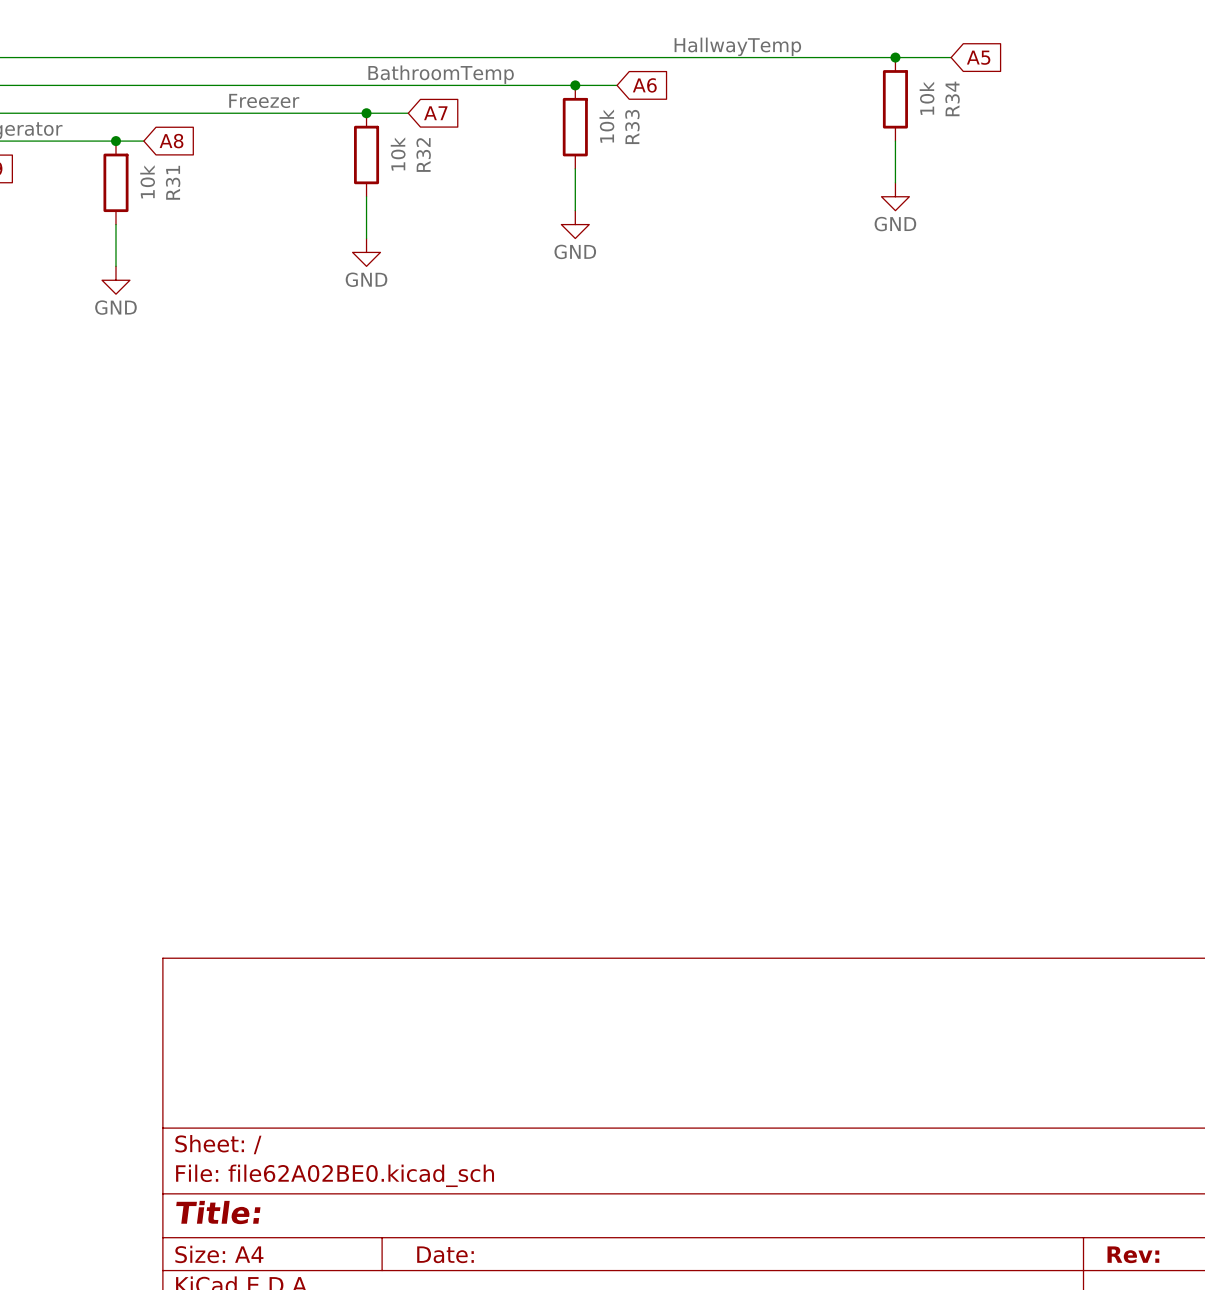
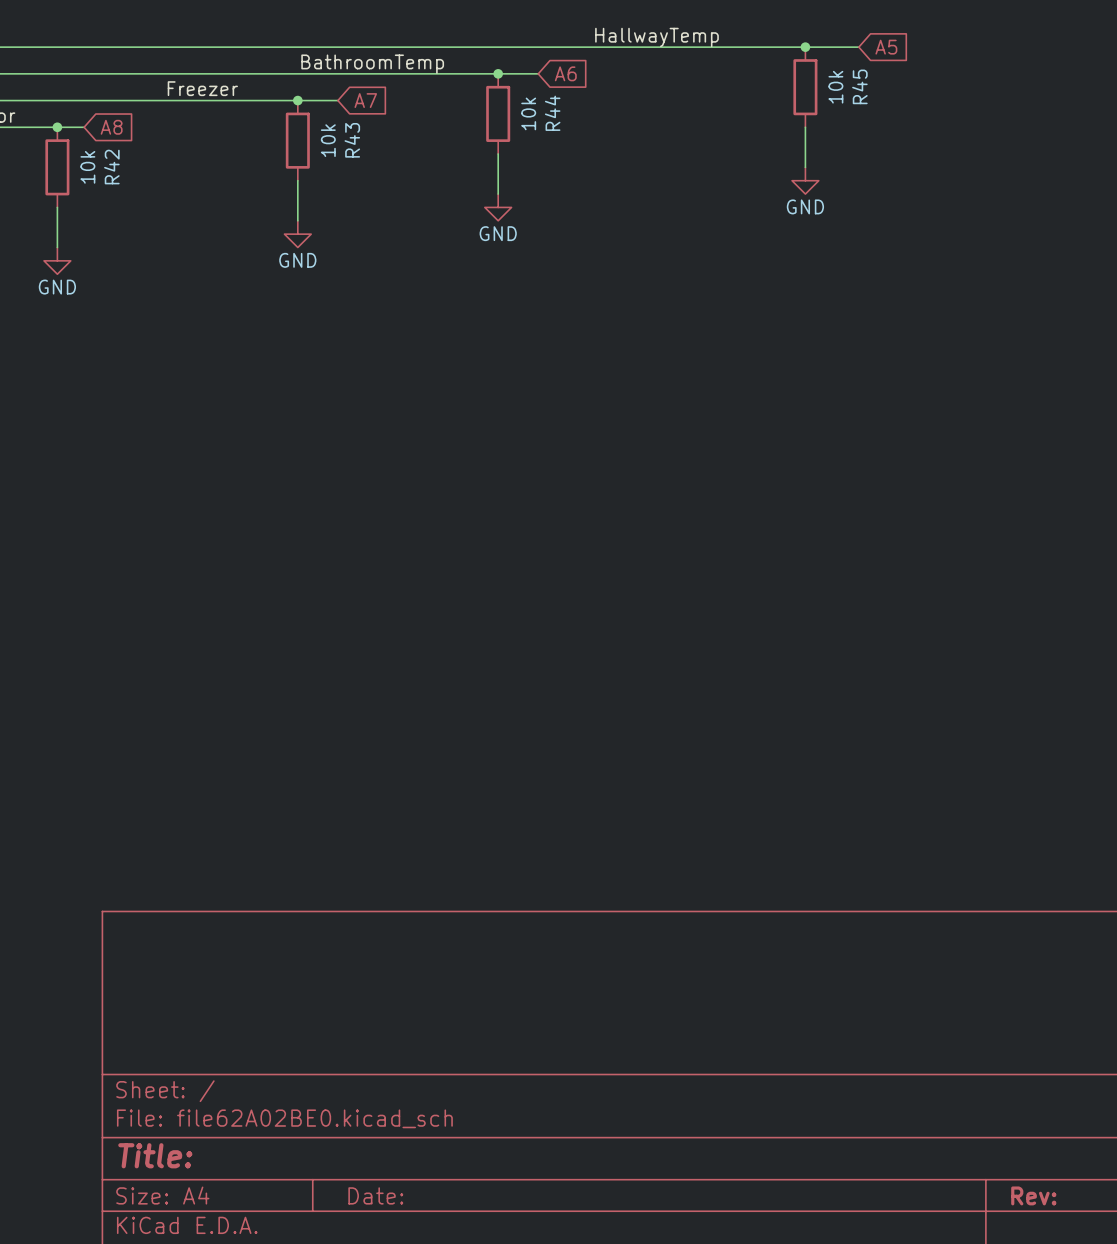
R34 name: R34 (952, 98) -> R45 (859, 86)
R33 name: R33 (632, 126) -> R44 (552, 113)
R32 name: R32 (423, 155) -> R43 (352, 140)
R31 name: R31 (173, 182) -> R42 (111, 167)

